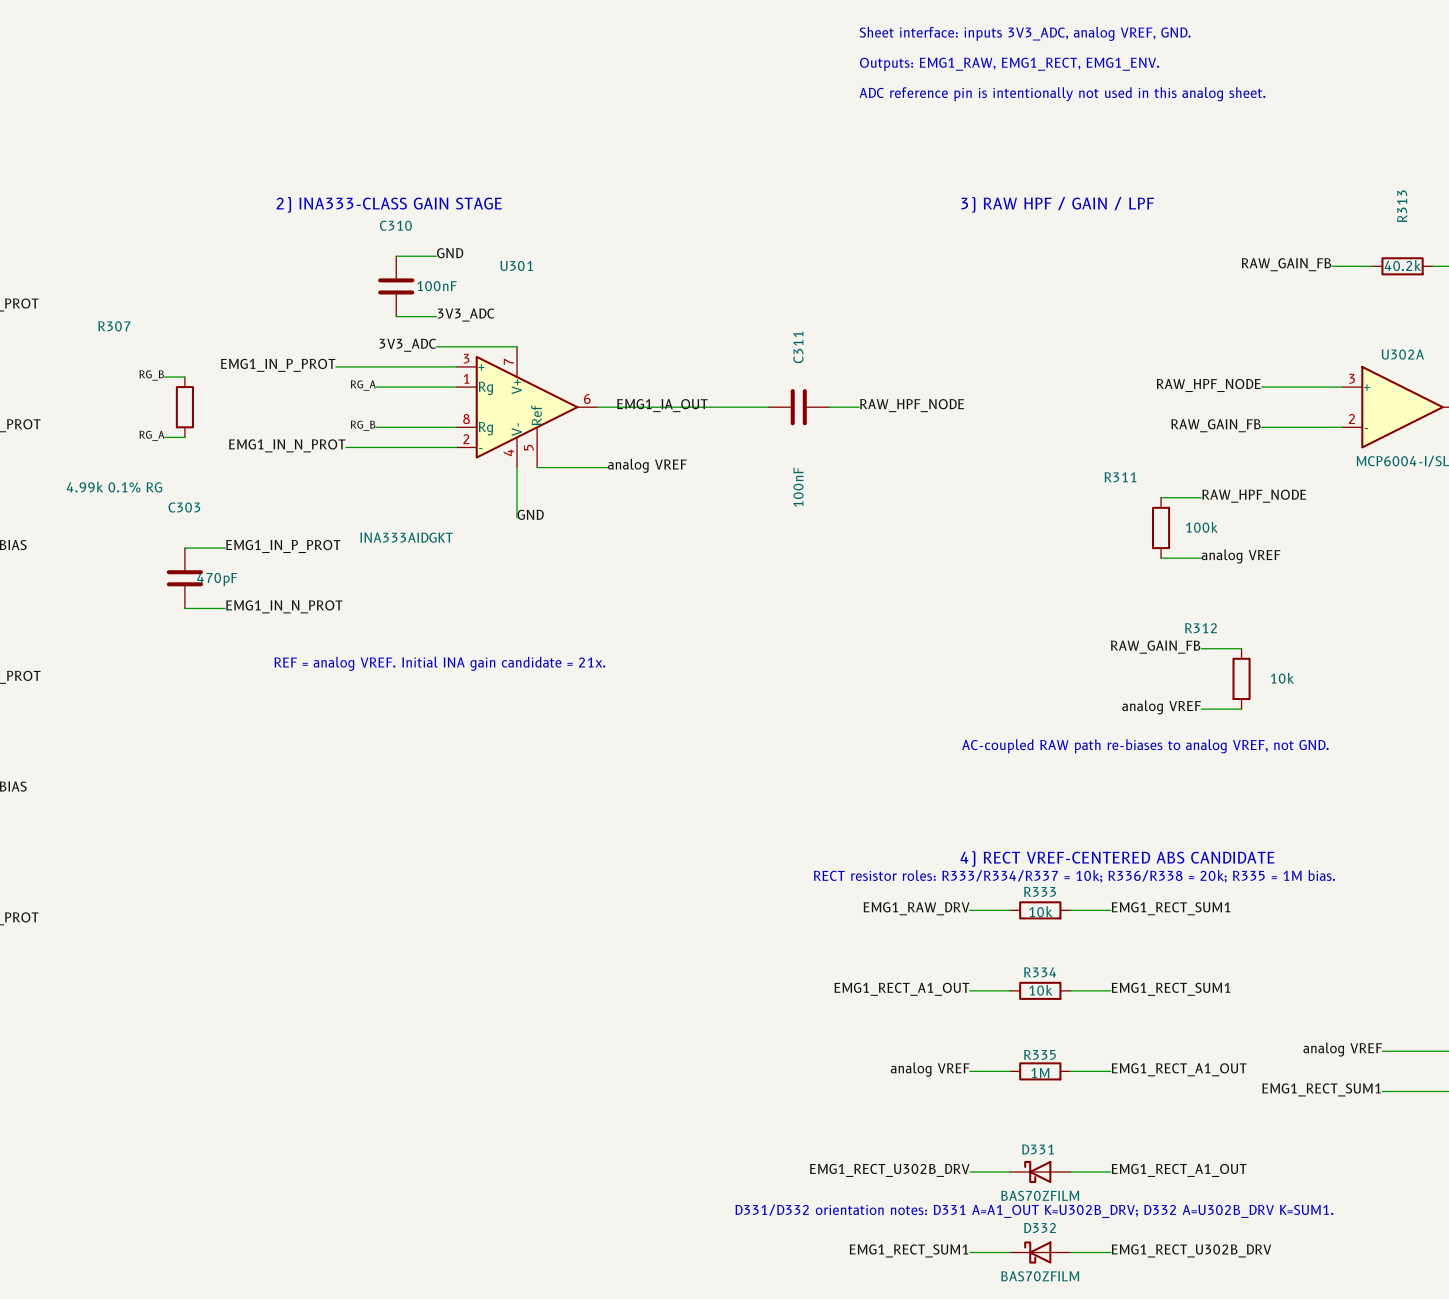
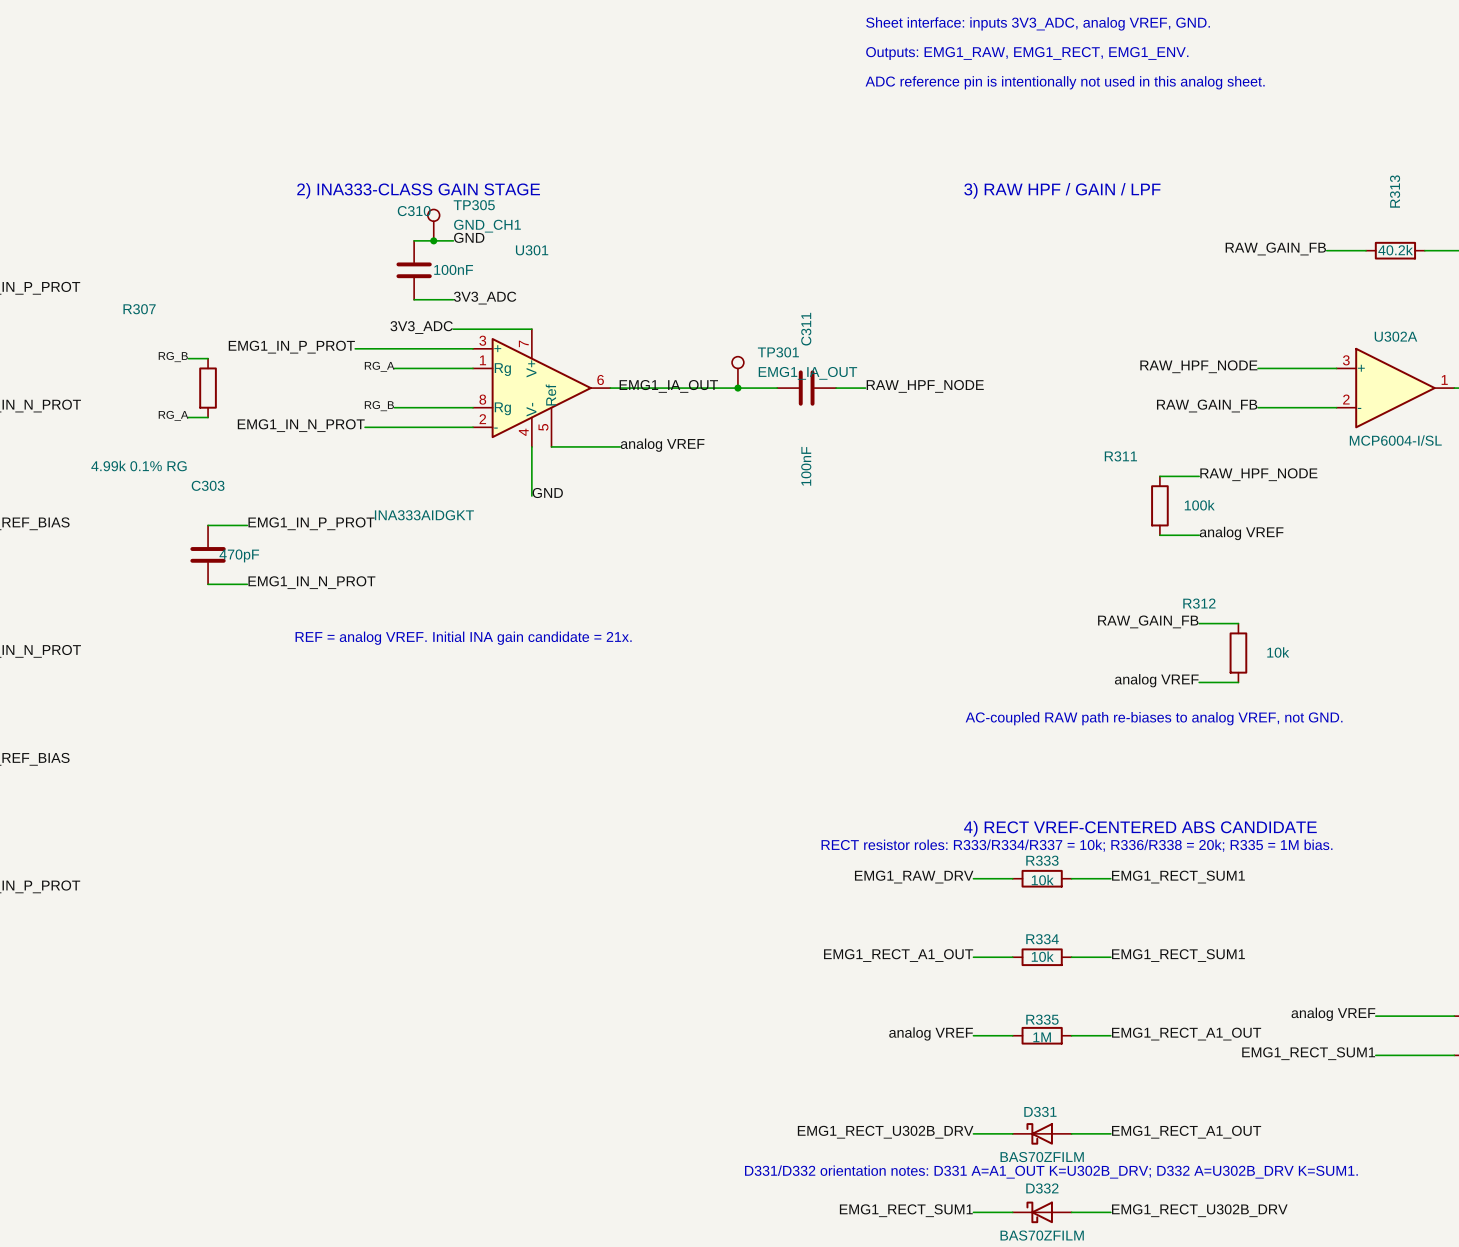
TP305: none -> GND_CH1 (433, 225)
junction: none -> (433, 240)
TP301: none -> EMG1_IA_OUT (737, 372)
junction: none -> (737, 388)

